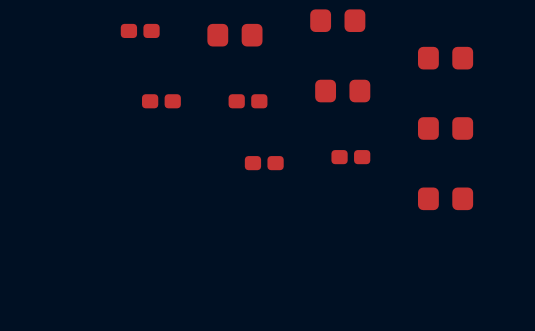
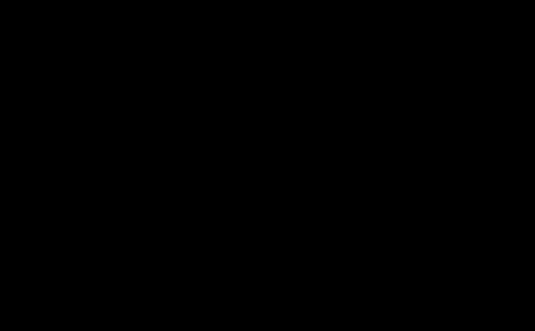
part: (337, 20) -> none
part: (140, 30) -> none
part: (234, 35) -> none
part: (445, 58) -> none
part: (342, 91) -> none
part: (161, 101) -> none
part: (248, 101) -> none
part: (445, 128) -> none
part: (350, 157) -> none
part: (264, 163) -> none
part: (445, 198) -> none

